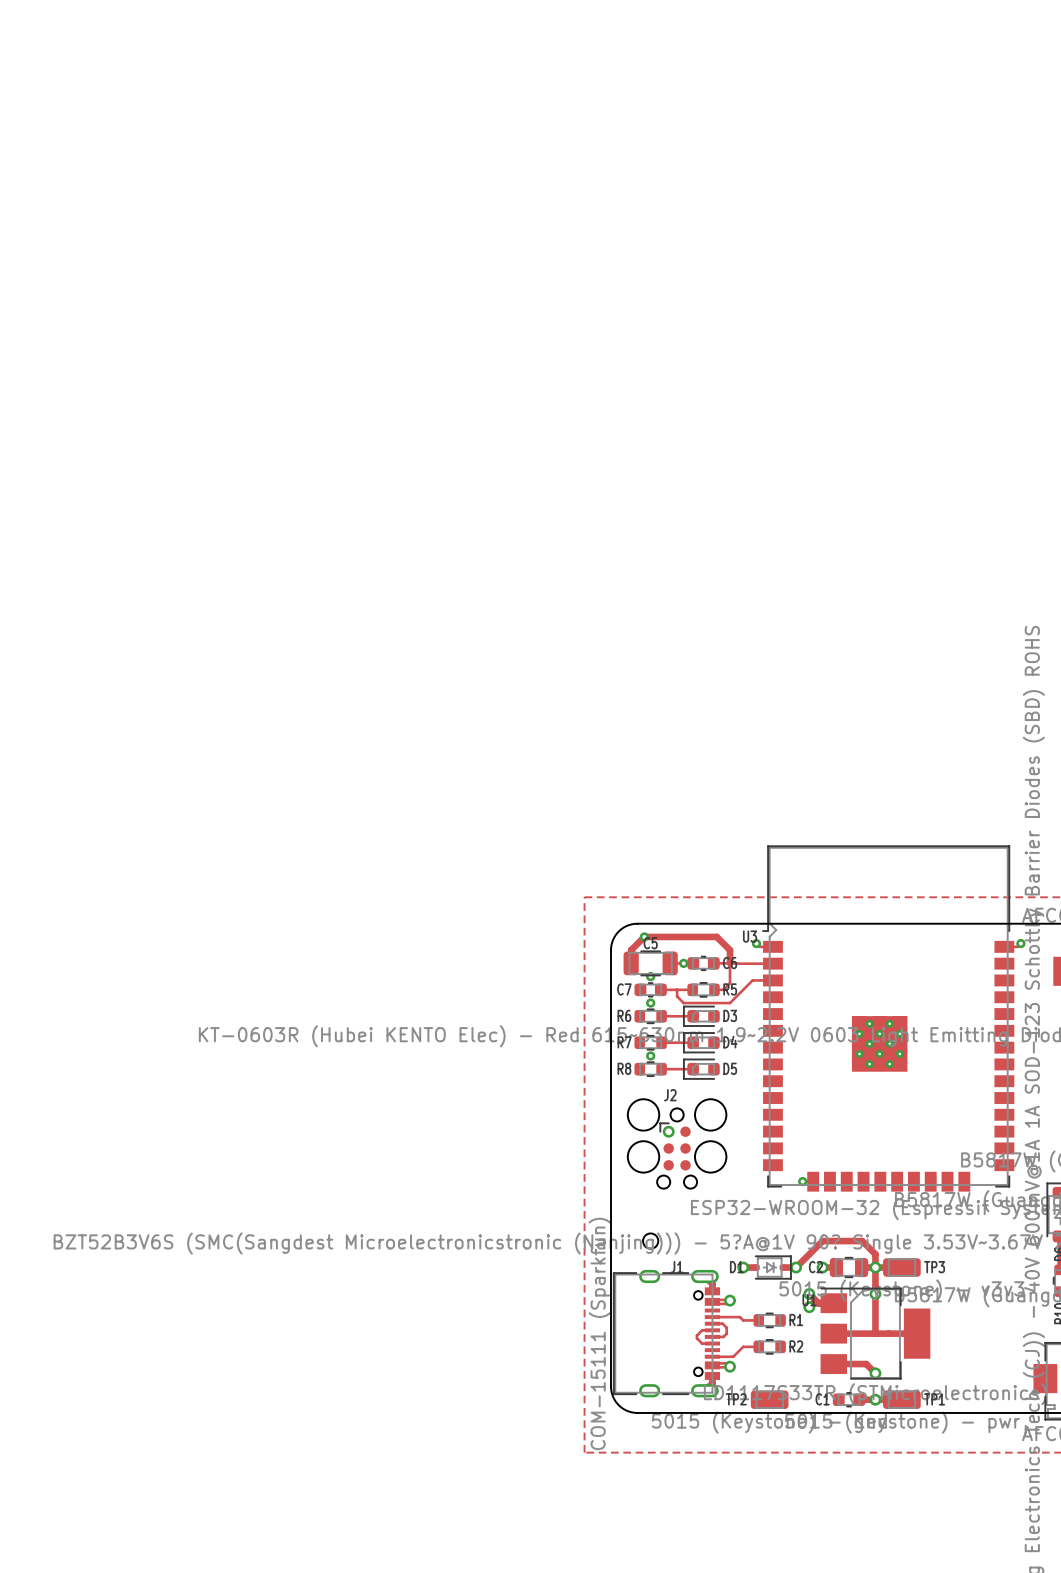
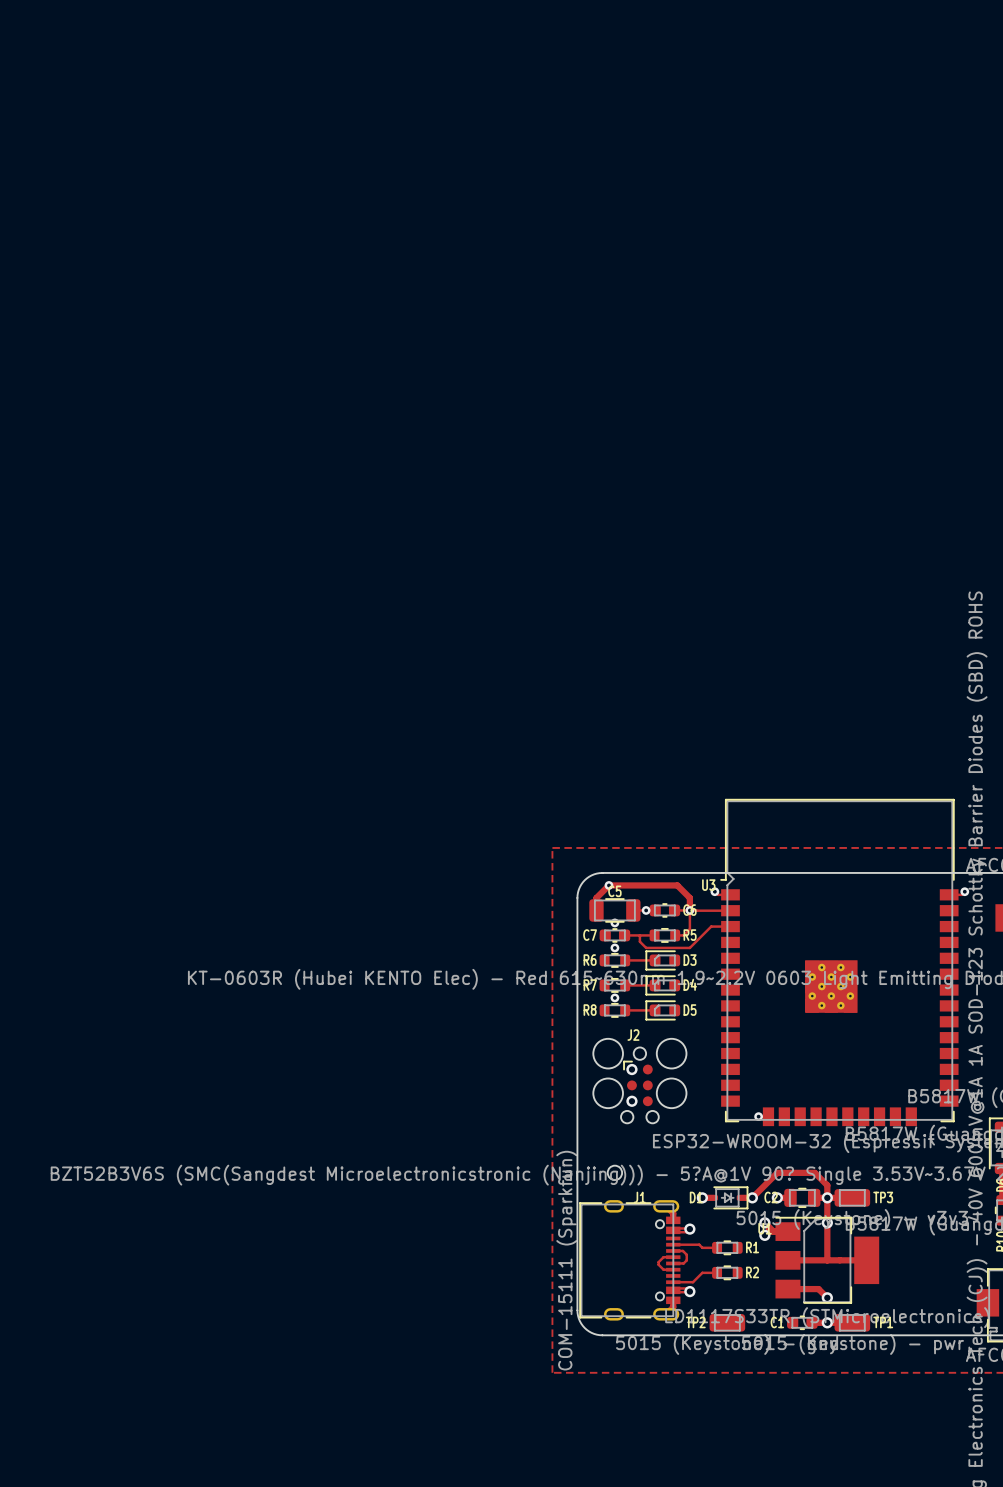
via: none -> (689, 910)
via: none -> (631, 1101)

